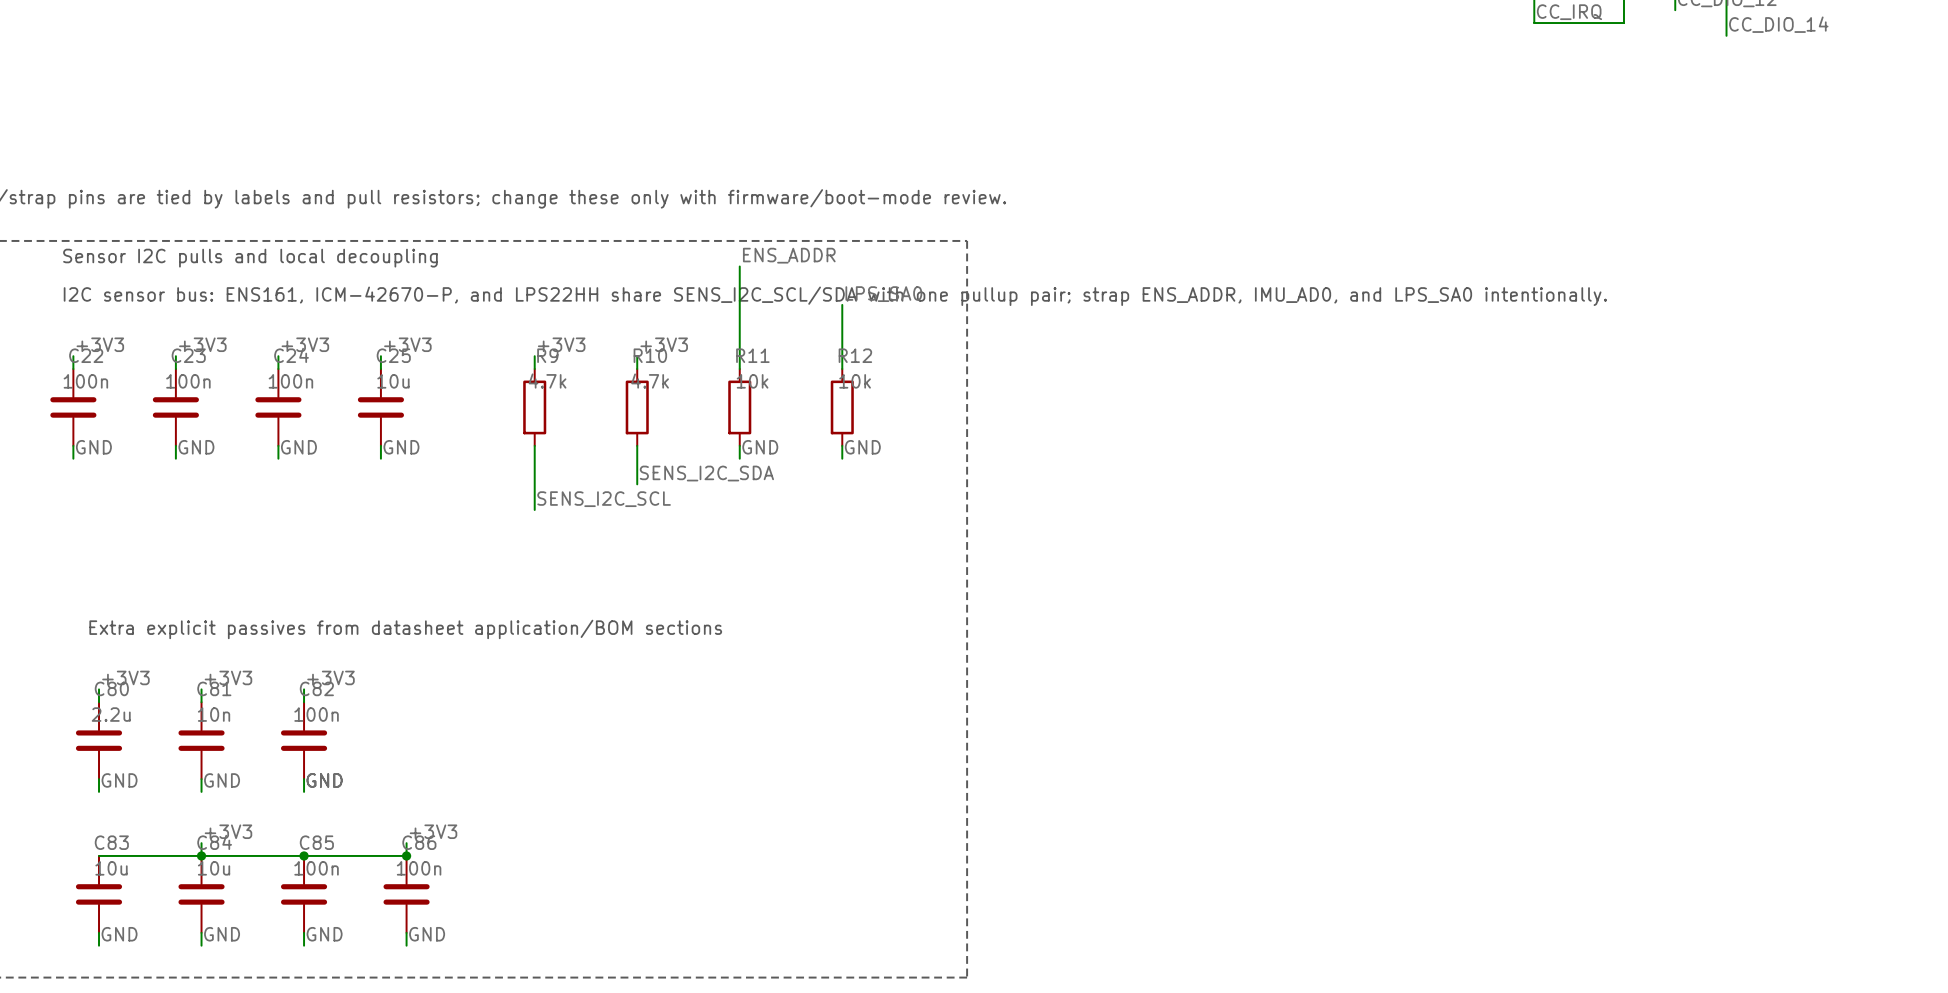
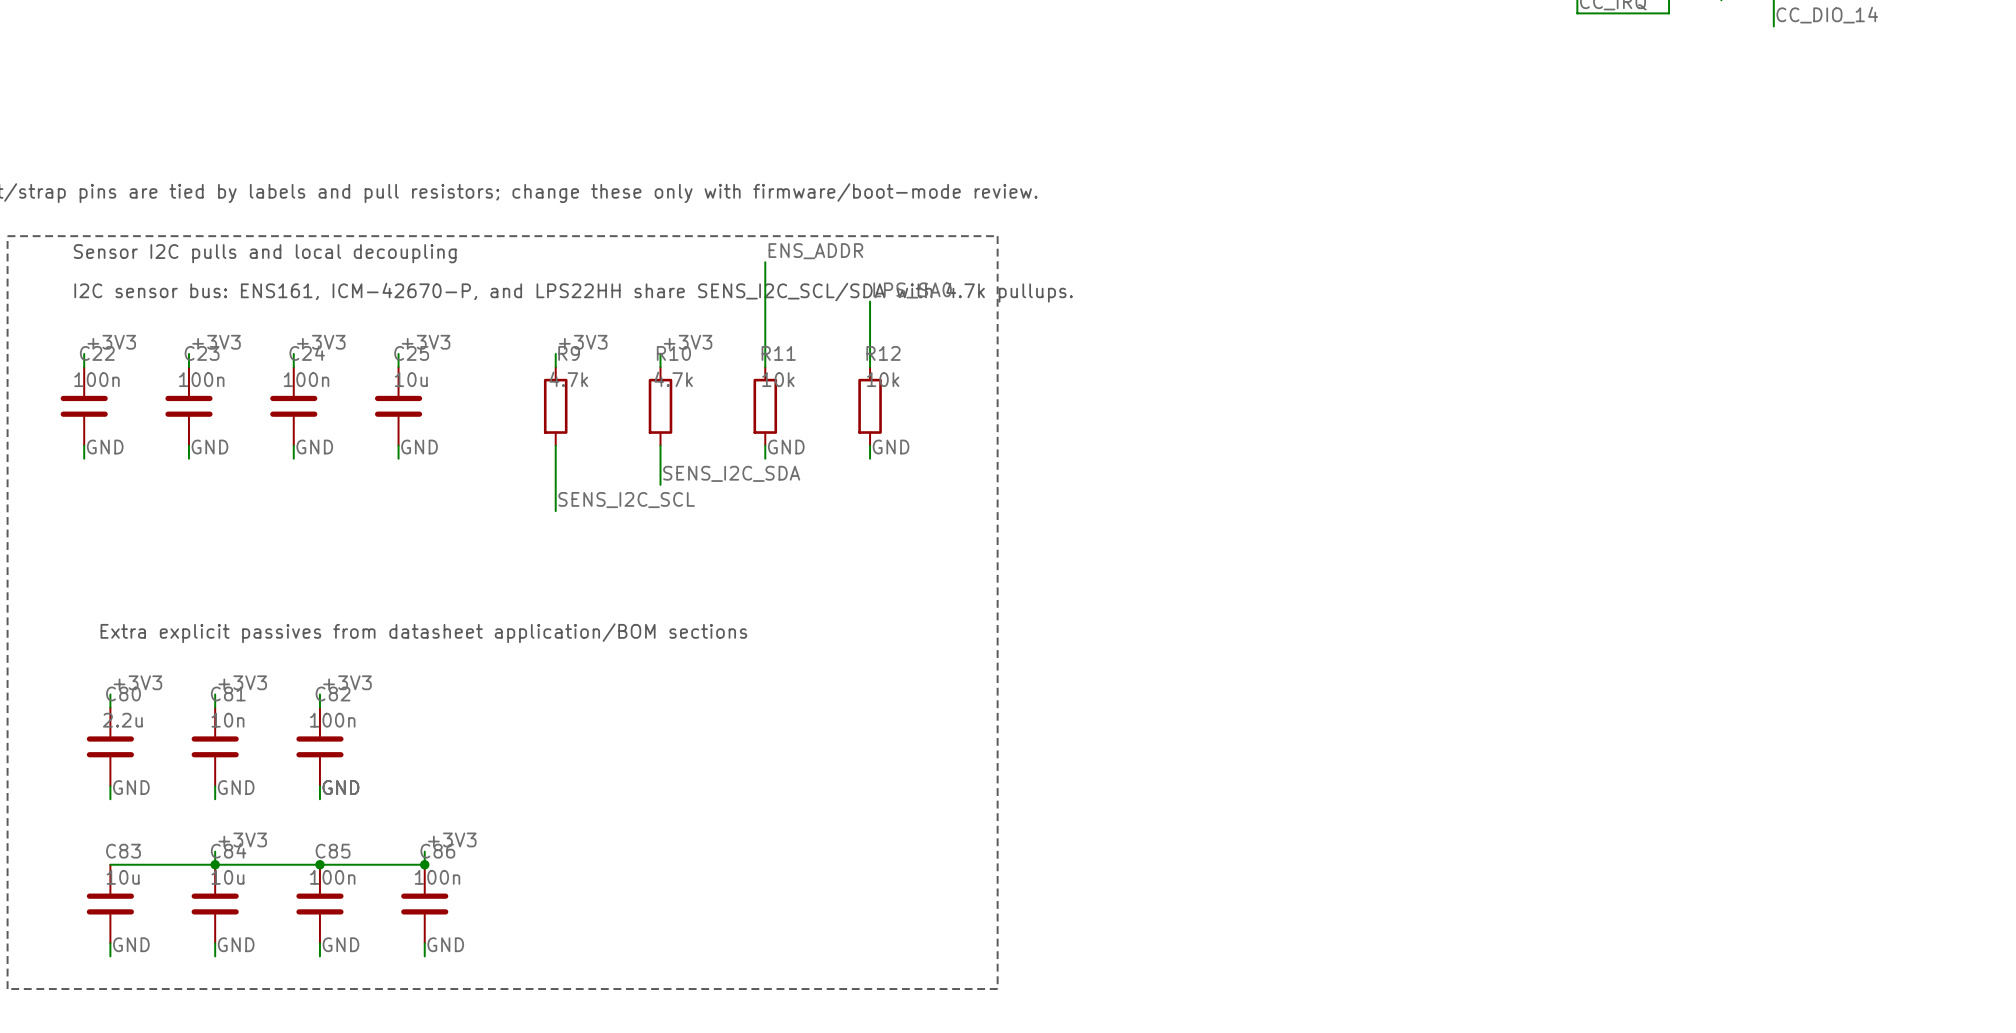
text: I2C sensor bus: ENS161, ICM-42670-P, and LPS22HH share SENS_I2C_SCL/SDA with one pullup pair; strap ENS_ADDR, IMU_AD0, and LPS_SA0 intentionally. (835, 296) -> I2C sensor bus: ENS161, ICM-42670-P, and LPS22HH share SENS_I2C_SCL/SDA with 4.7k pullups. (573, 292)

